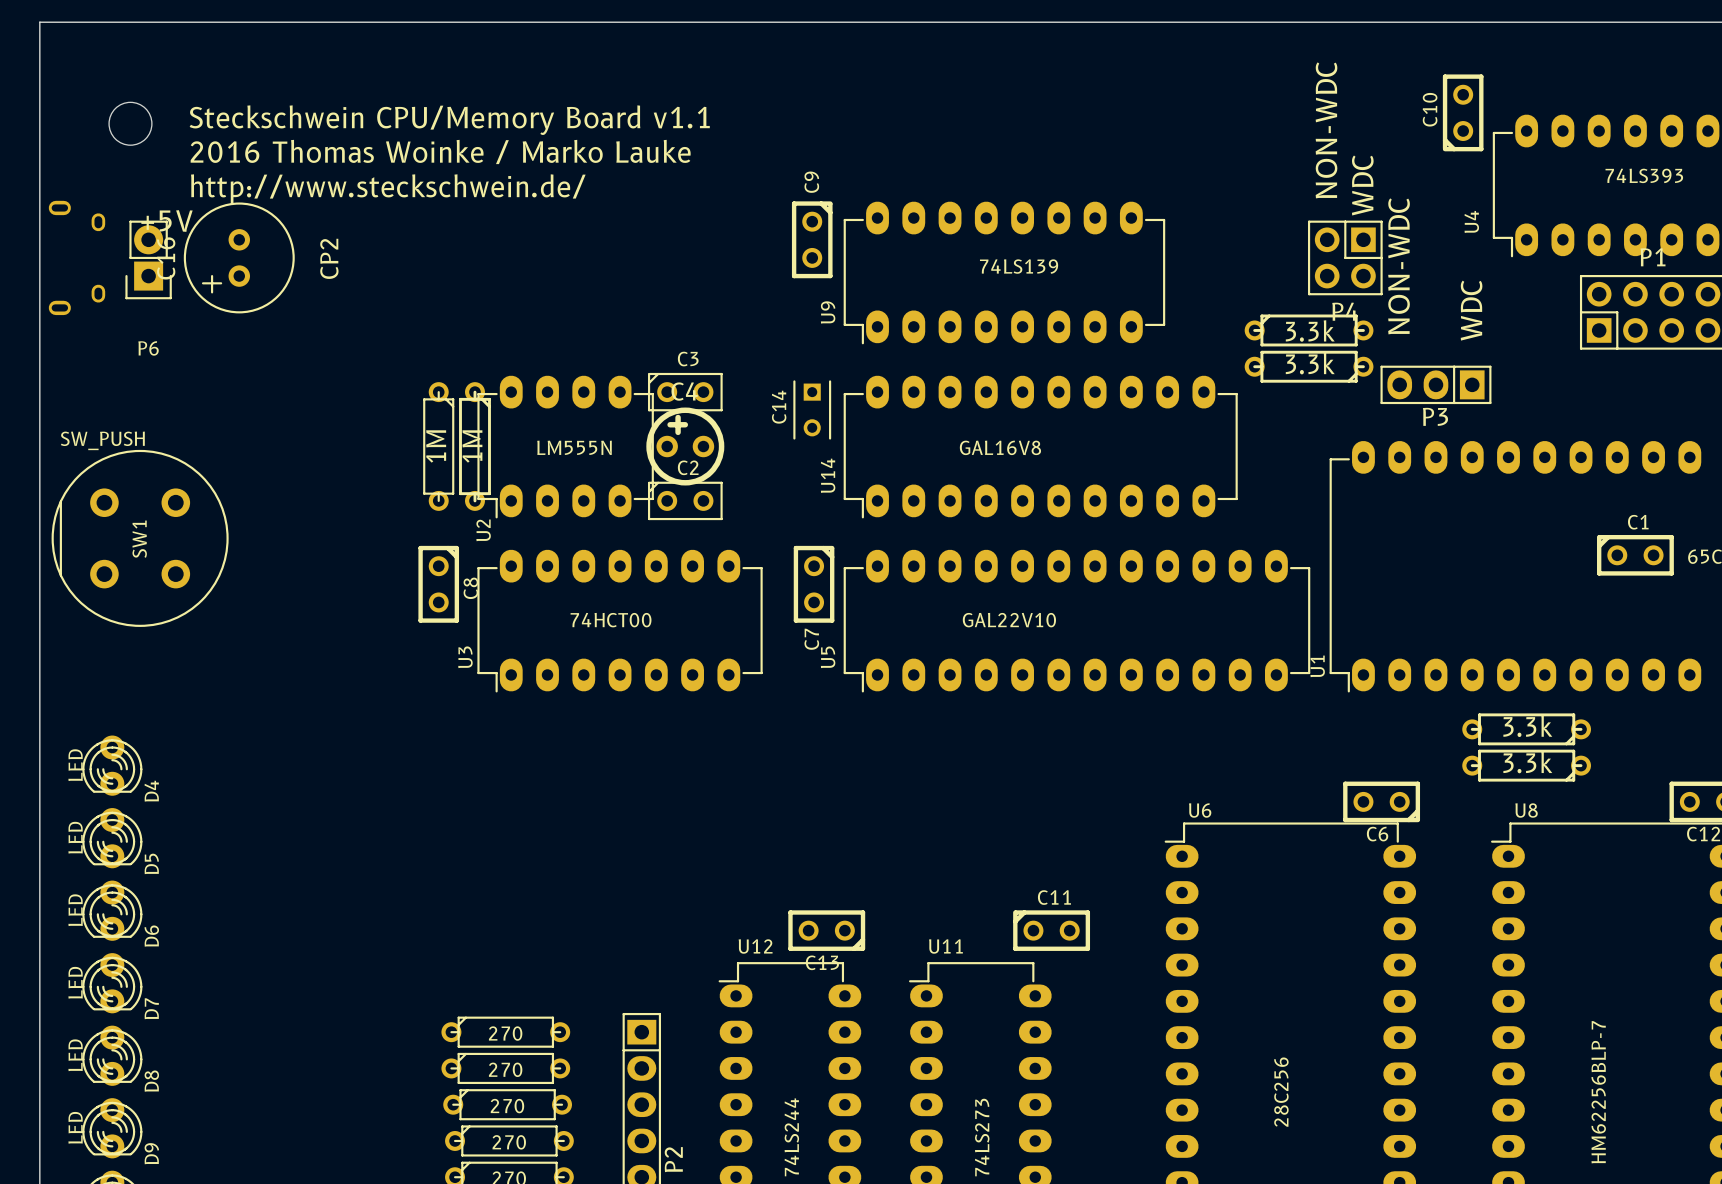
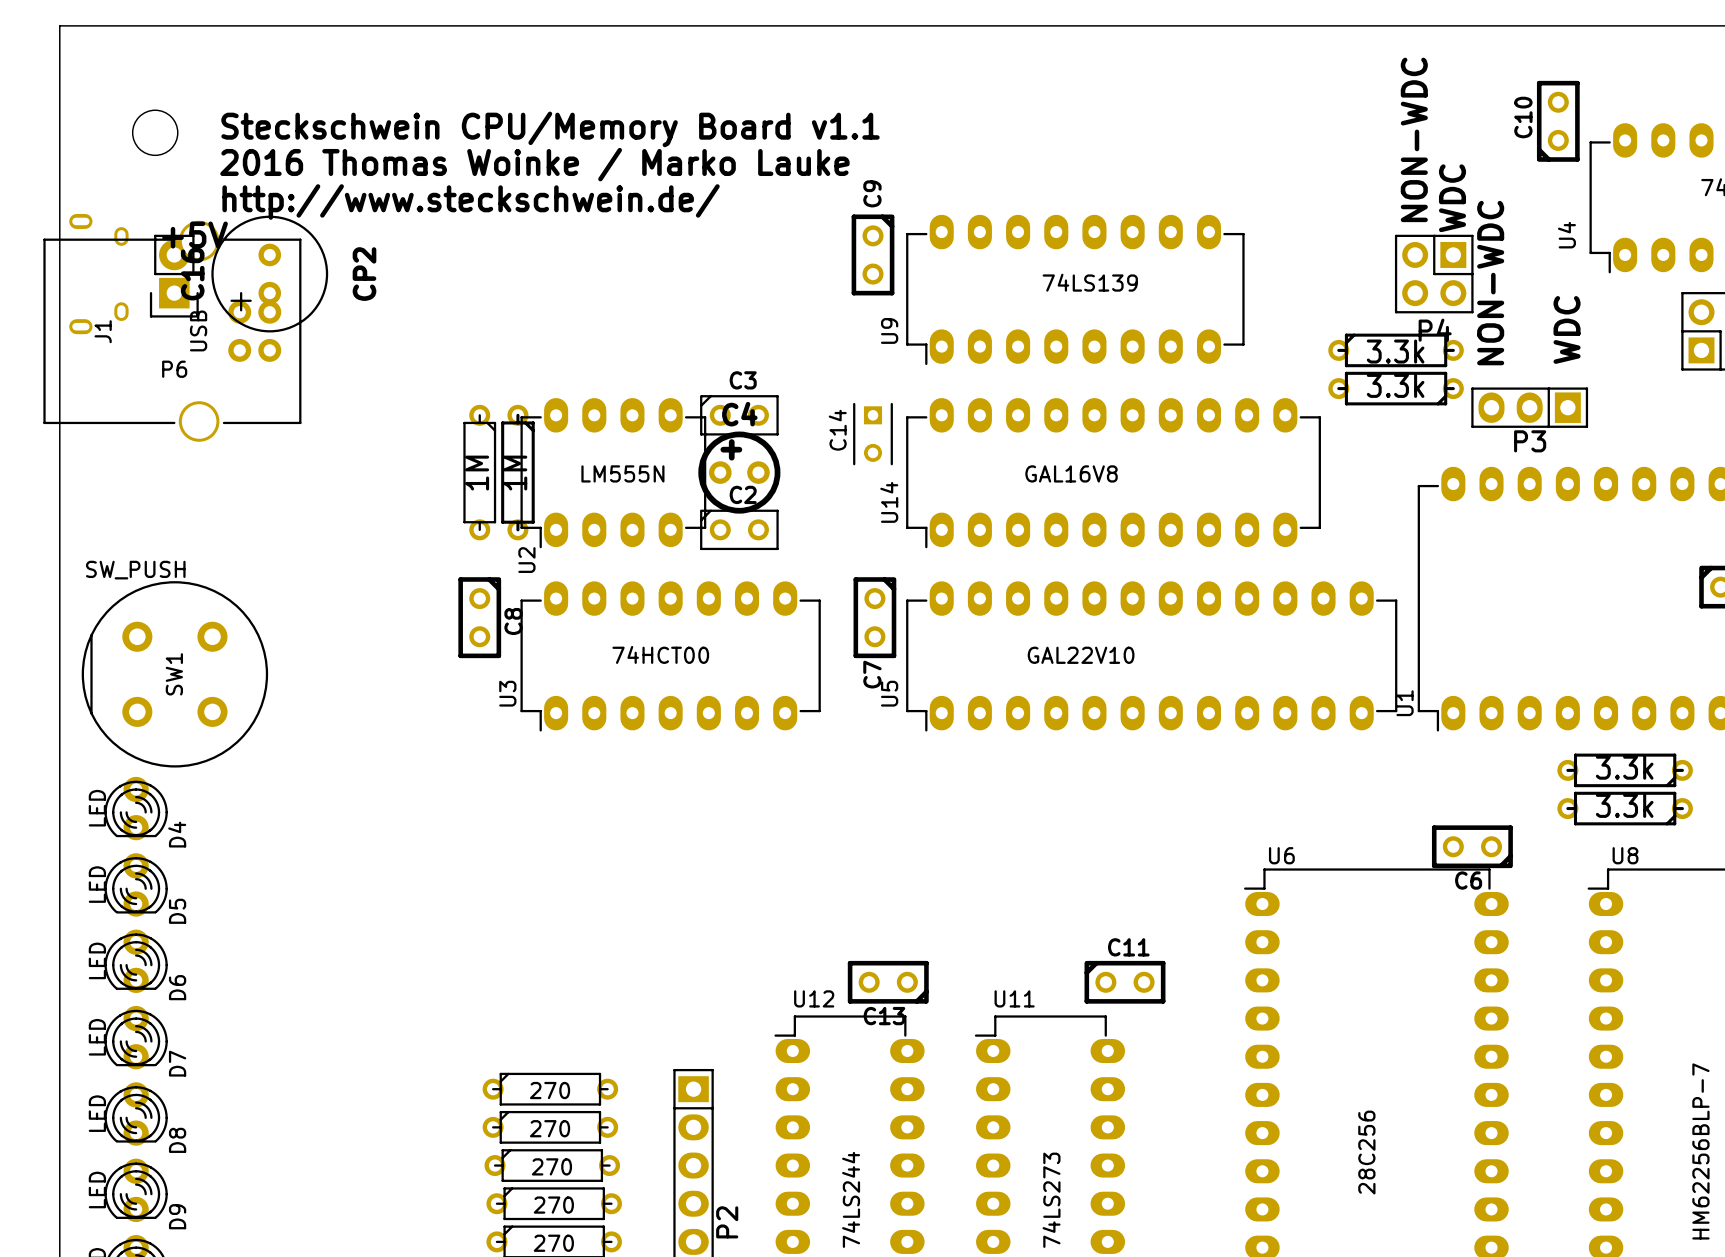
J1: none -> USB (172, 331)
SW1 position: (140, 538) -> (174, 674)

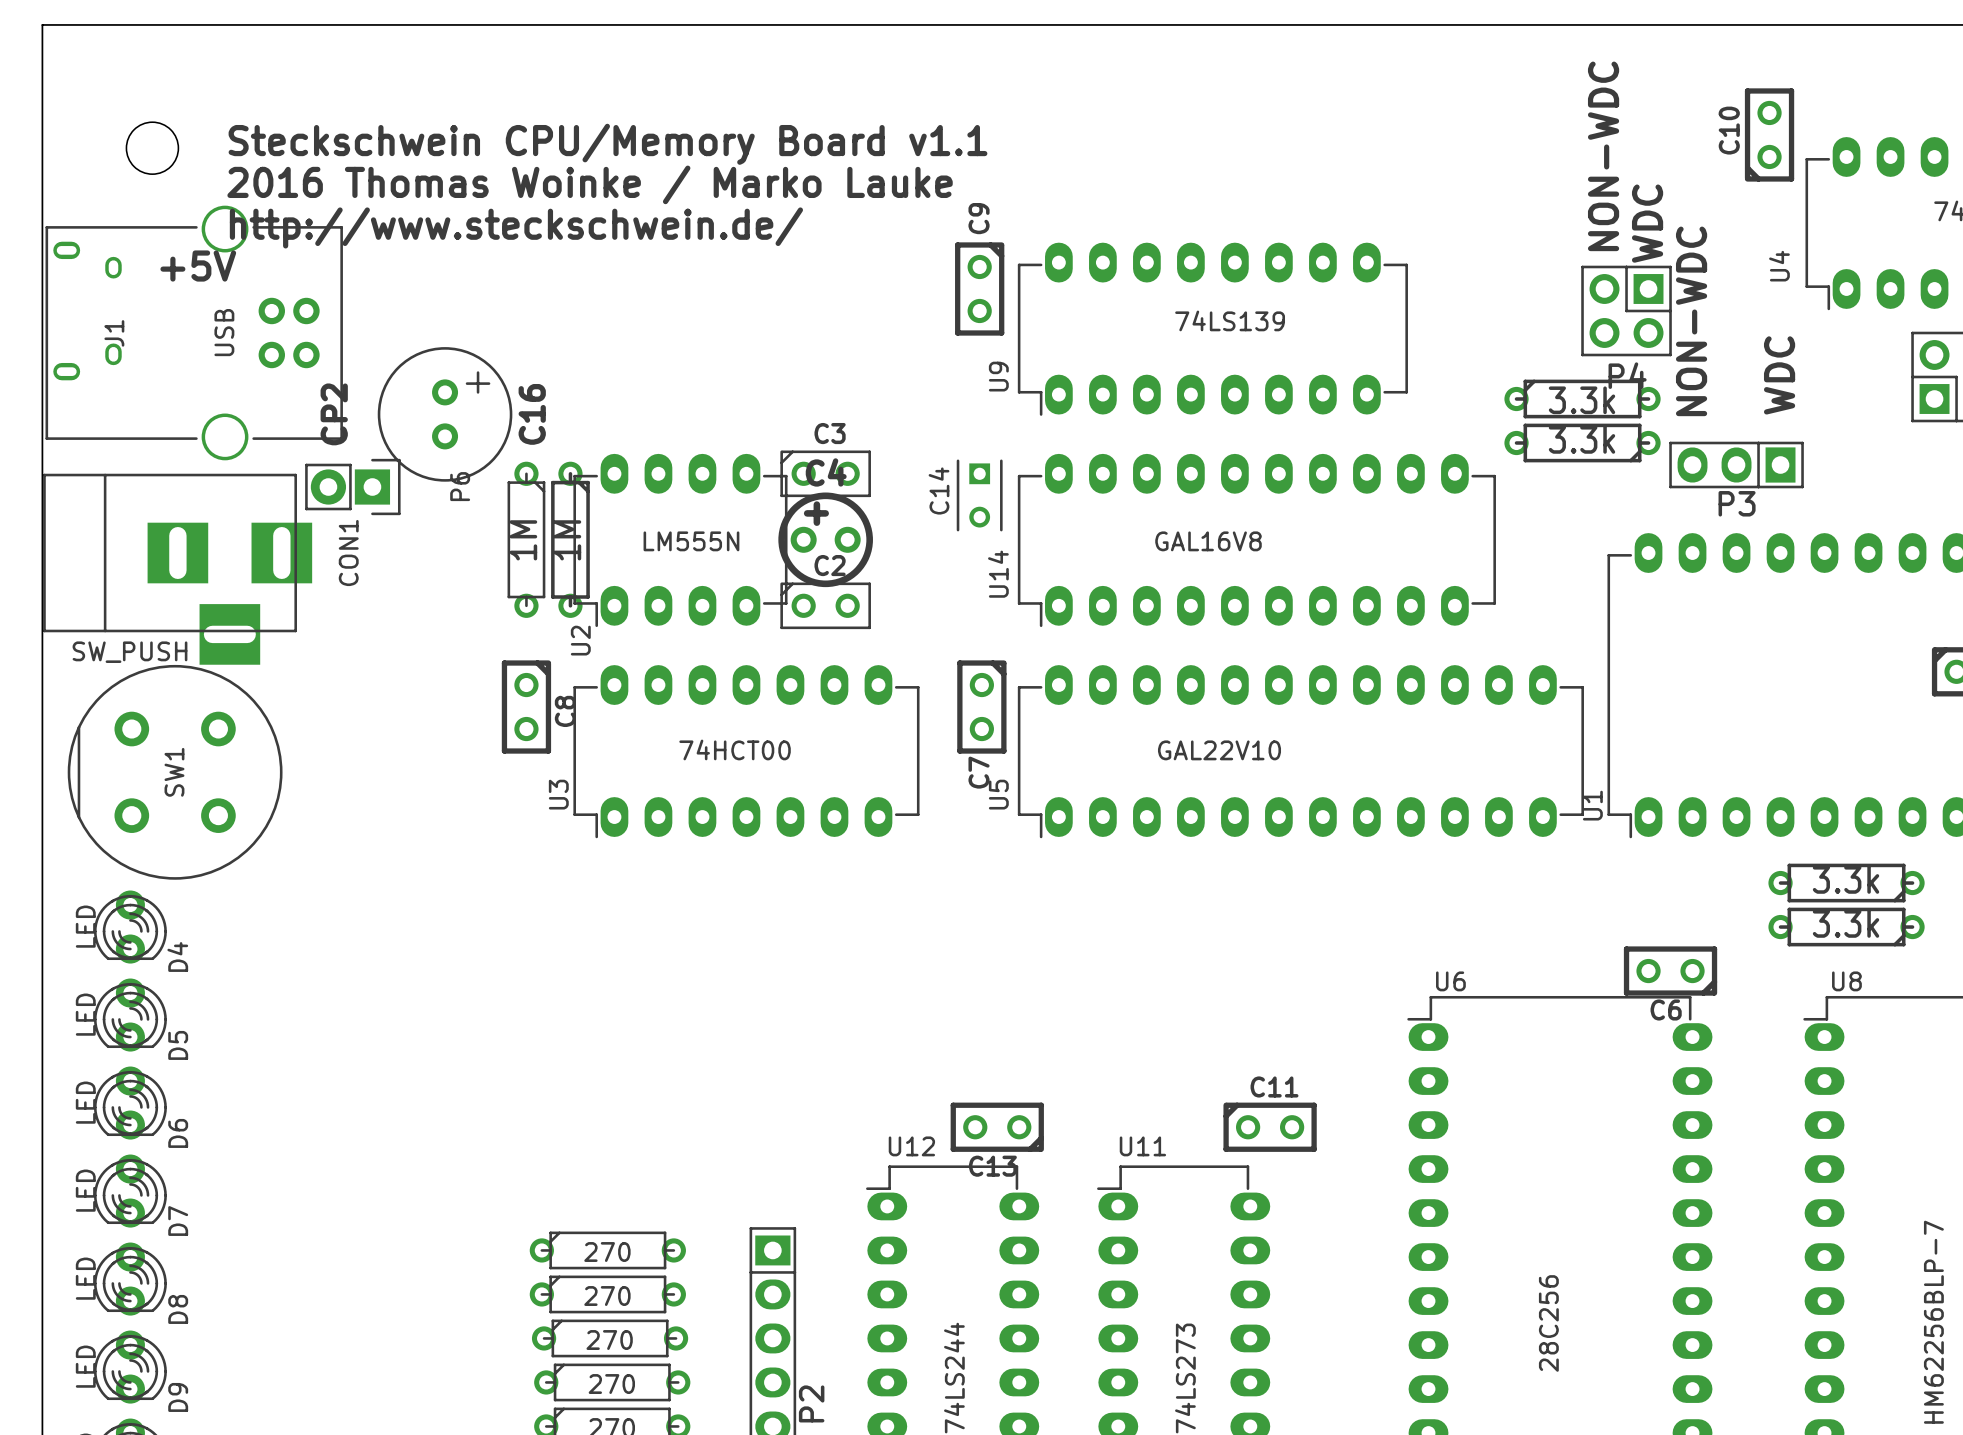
C16 rotation: 0° (269, 274) -> 180° (445, 414)
C16 position: (269, 274) -> (445, 414)
P6 rotation: 0° (174, 276) -> 90° counterclockwise (352, 487)
P6 position: (174, 276) -> (352, 487)
J1 position: (172, 331) -> (194, 332)
CON1: none -> (177, 569)

